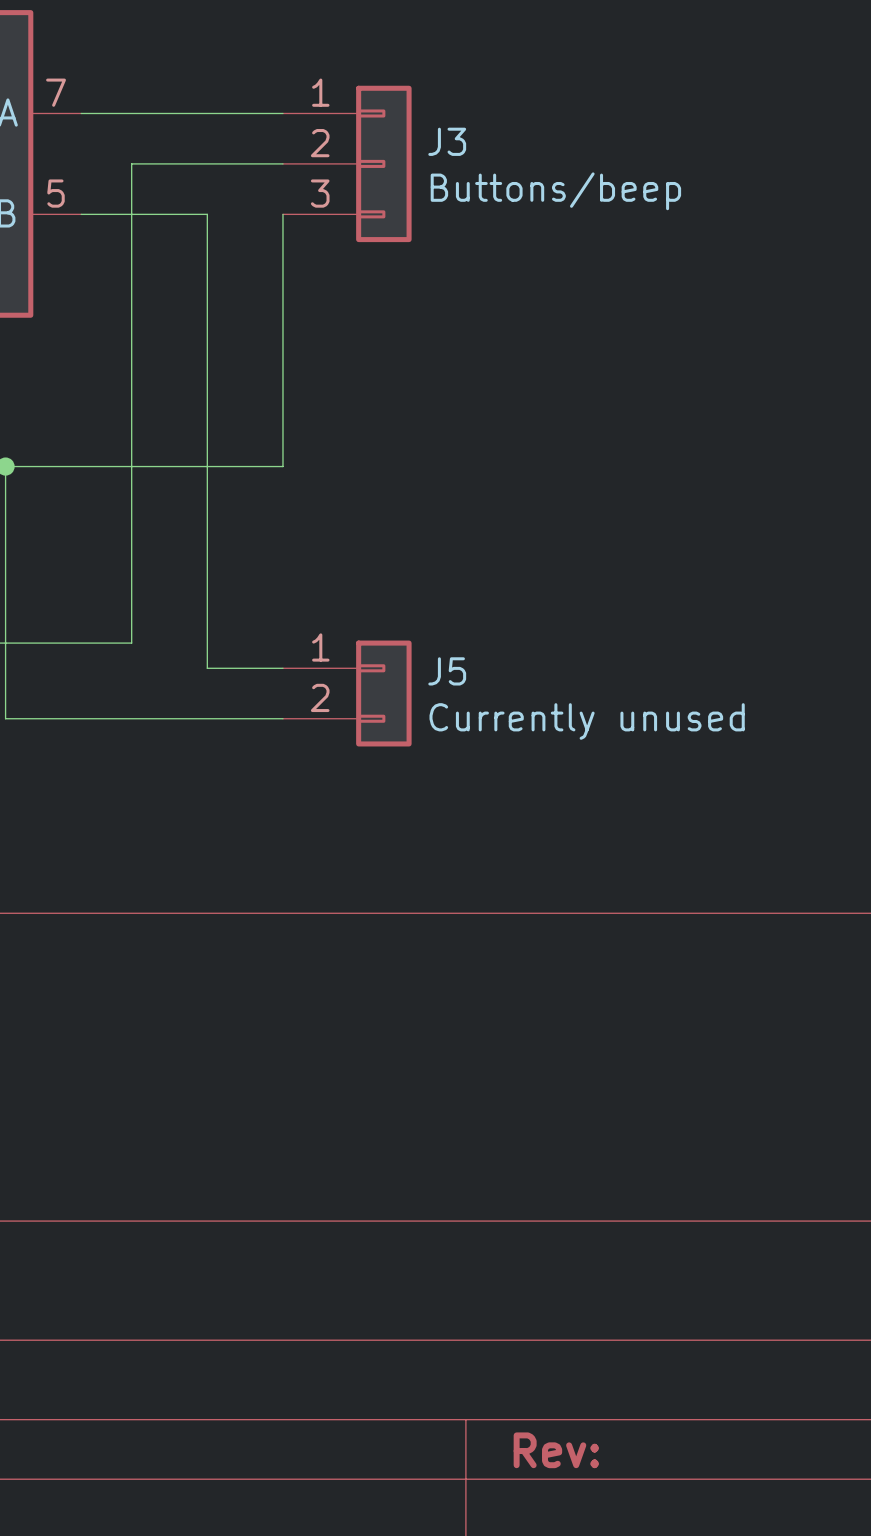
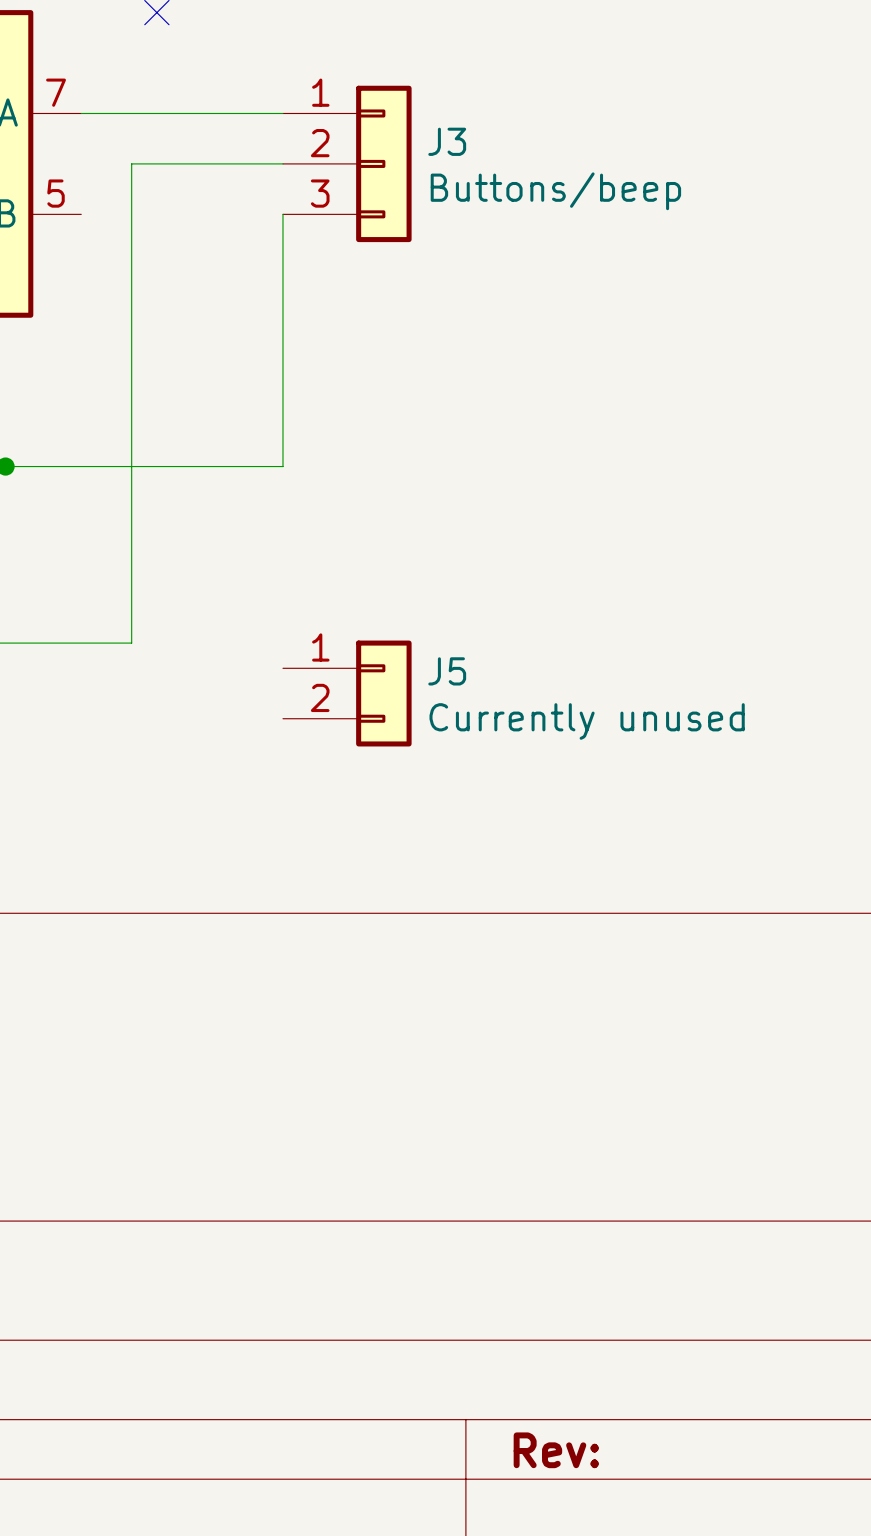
no-connect mark: none -> (156, 12)
wire: (81, 214) (207, 214) (207, 668) (282, 668) -> none
wire: (5, 466) (5, 718) (282, 718) -> none

